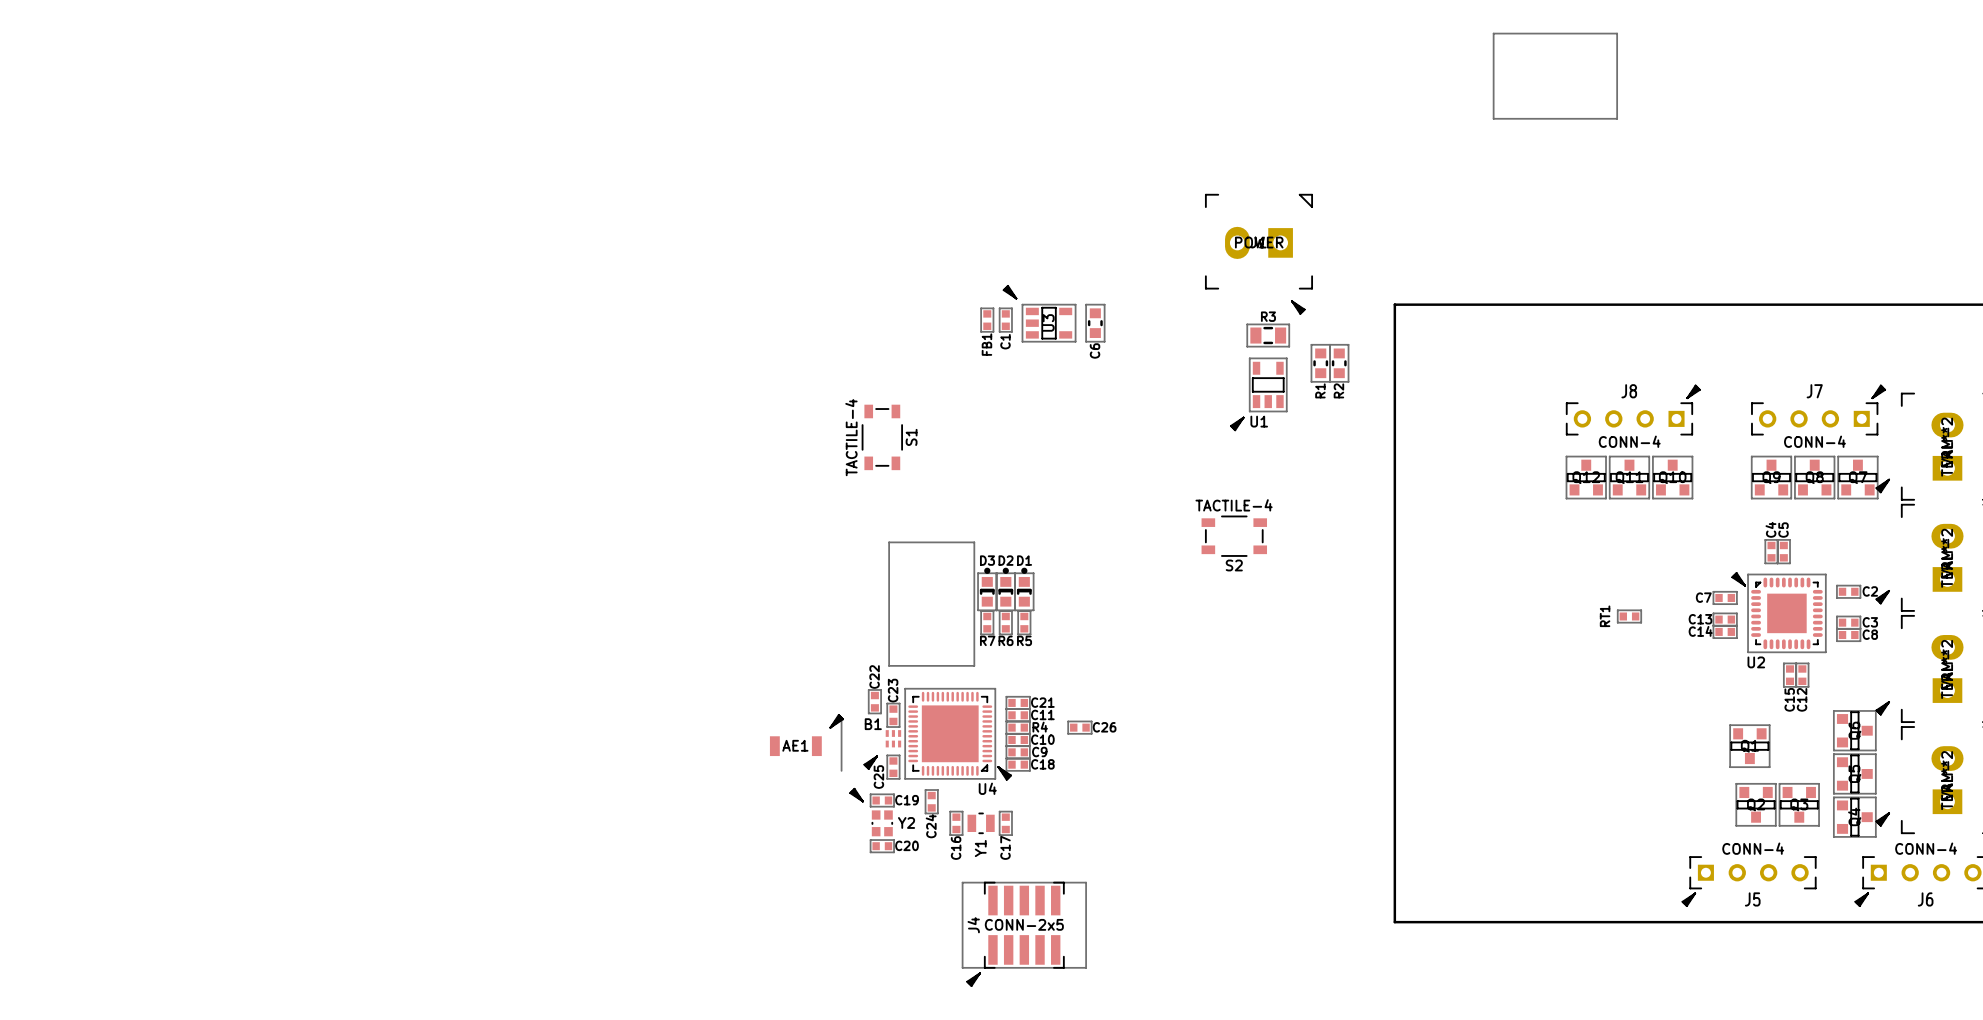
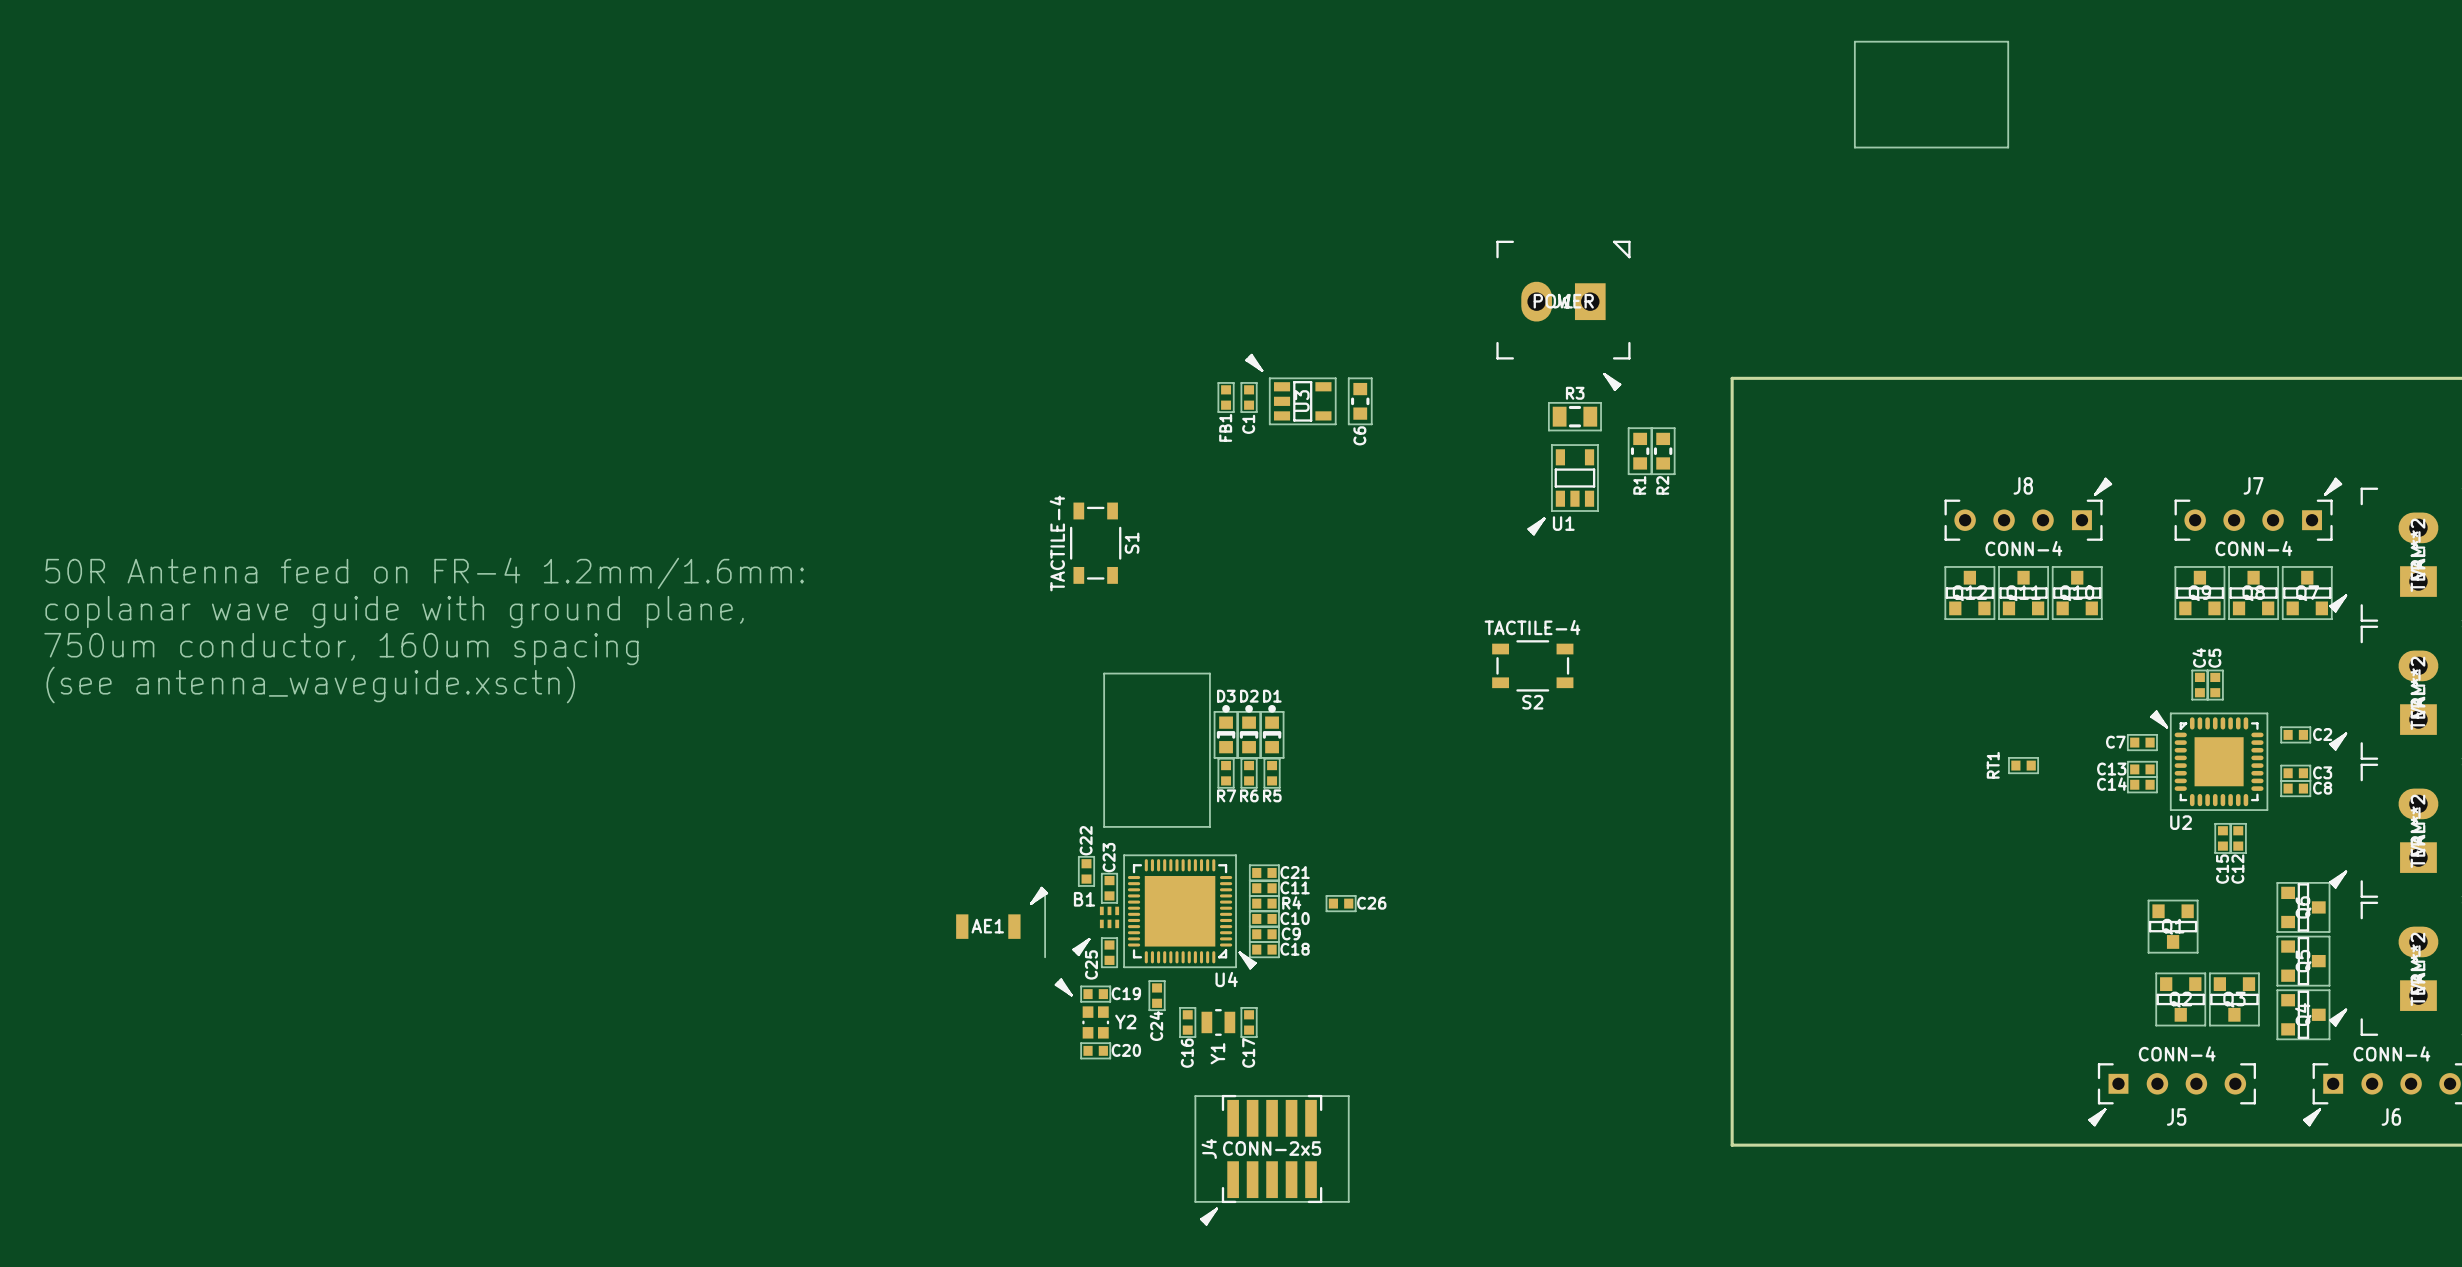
text: none -> 50R Antenna feed on FR-4 1.2mm/1.6mm: (424, 573)
text: none -> coplanar wave guide with ground plane, (394, 612)
text: none -> 750um conductor, 160um spacing (341, 649)
text: none -> (see antenna_waveguide.xsctn) (310, 684)

